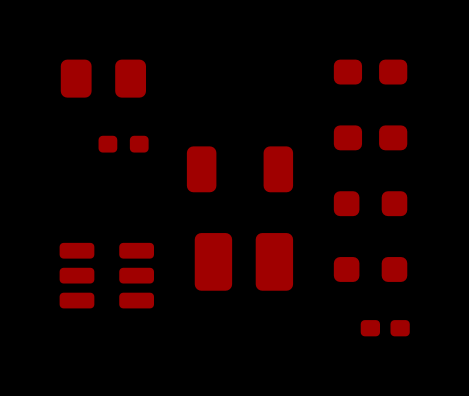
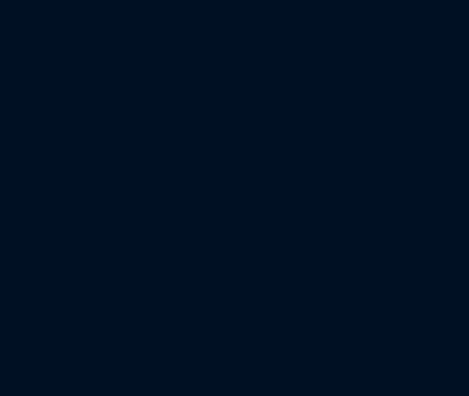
part: (370, 72) -> none
part: (103, 78) -> none
part: (370, 137) -> none
part: (123, 144) -> none
part: (239, 169) -> none
part: (370, 203) -> none
part: (243, 261) -> none
part: (370, 269) -> none
part: (106, 275) -> none
part: (385, 328) -> none

